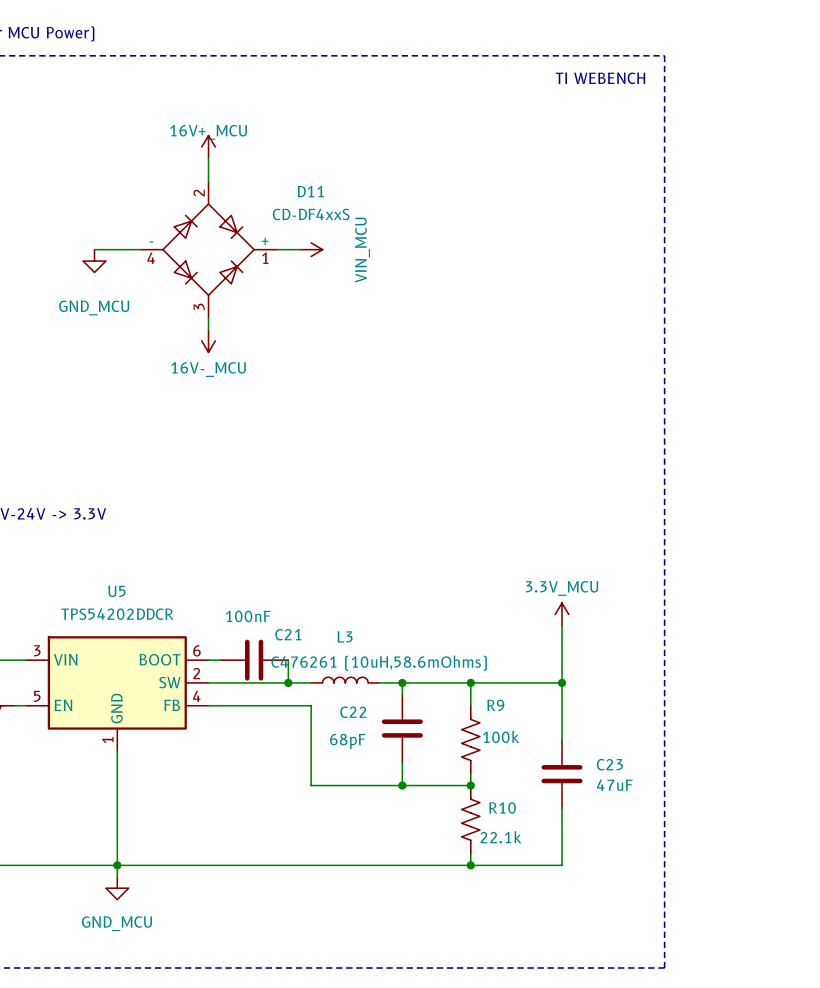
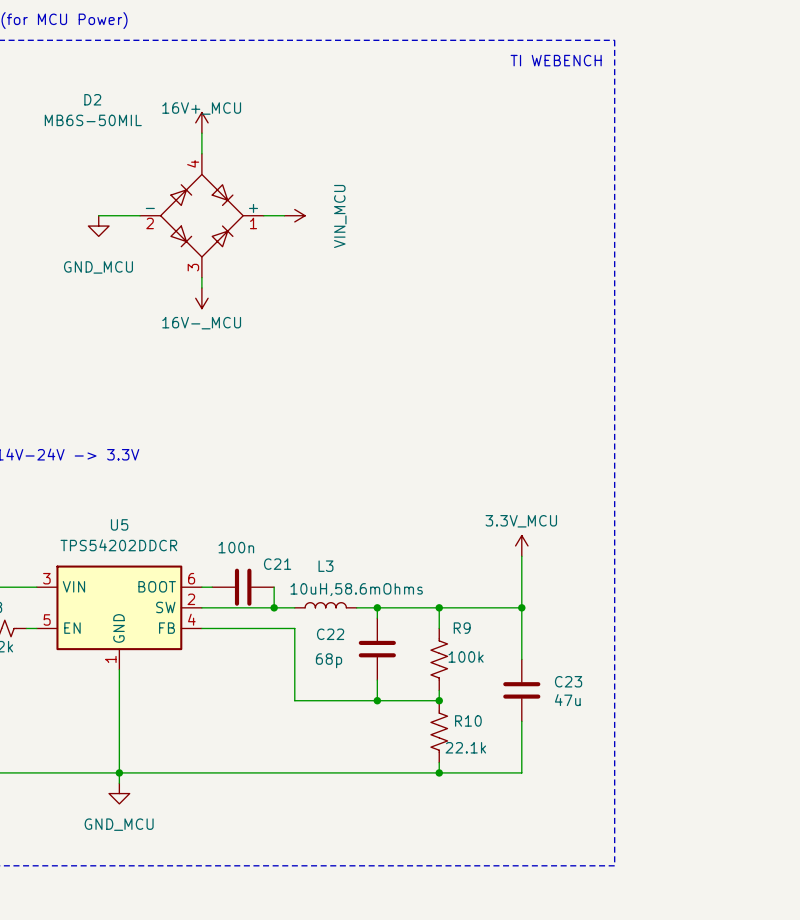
D11 name: D11 (310, 191) -> D2 (92, 99)
D11 pin number: 2 (199, 193) -> 4 (193, 163)
D11 value: CD-DF4xxS (311, 214) -> MB6S-50MIL (93, 120)
D11 pin number: 4 (151, 258) -> 2 (150, 223)
C21 value: 100nF (248, 616) -> 100n (236, 547)
L3 value: C476261 (10uH,58.6mOhms) (379, 663) -> 10uH,58.6mOhms (356, 589)
C22 value: 68pF (347, 741) -> 68p (329, 660)
C23 value: 47uF (614, 785) -> 47u (567, 700)

